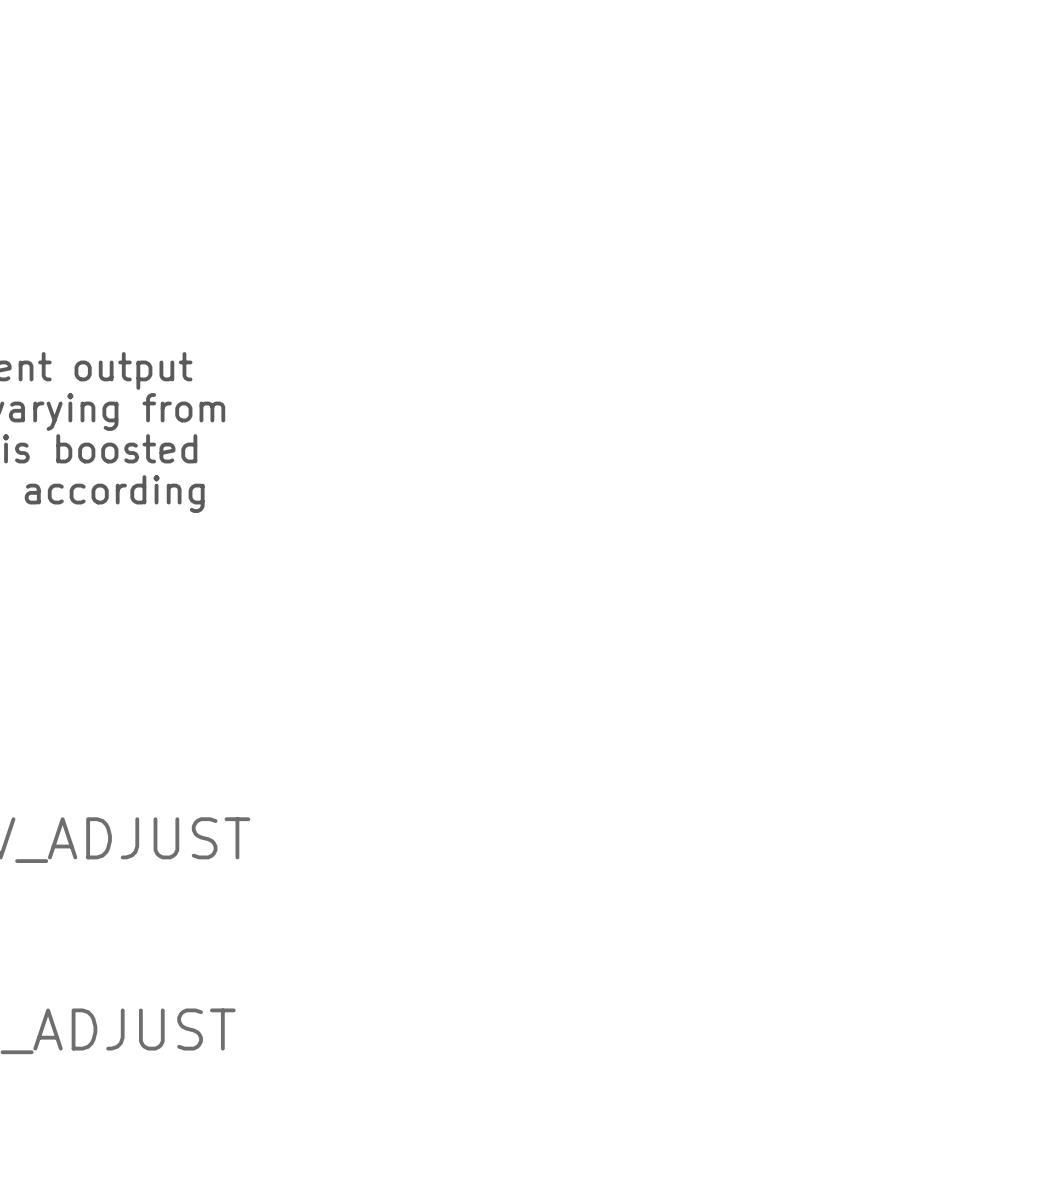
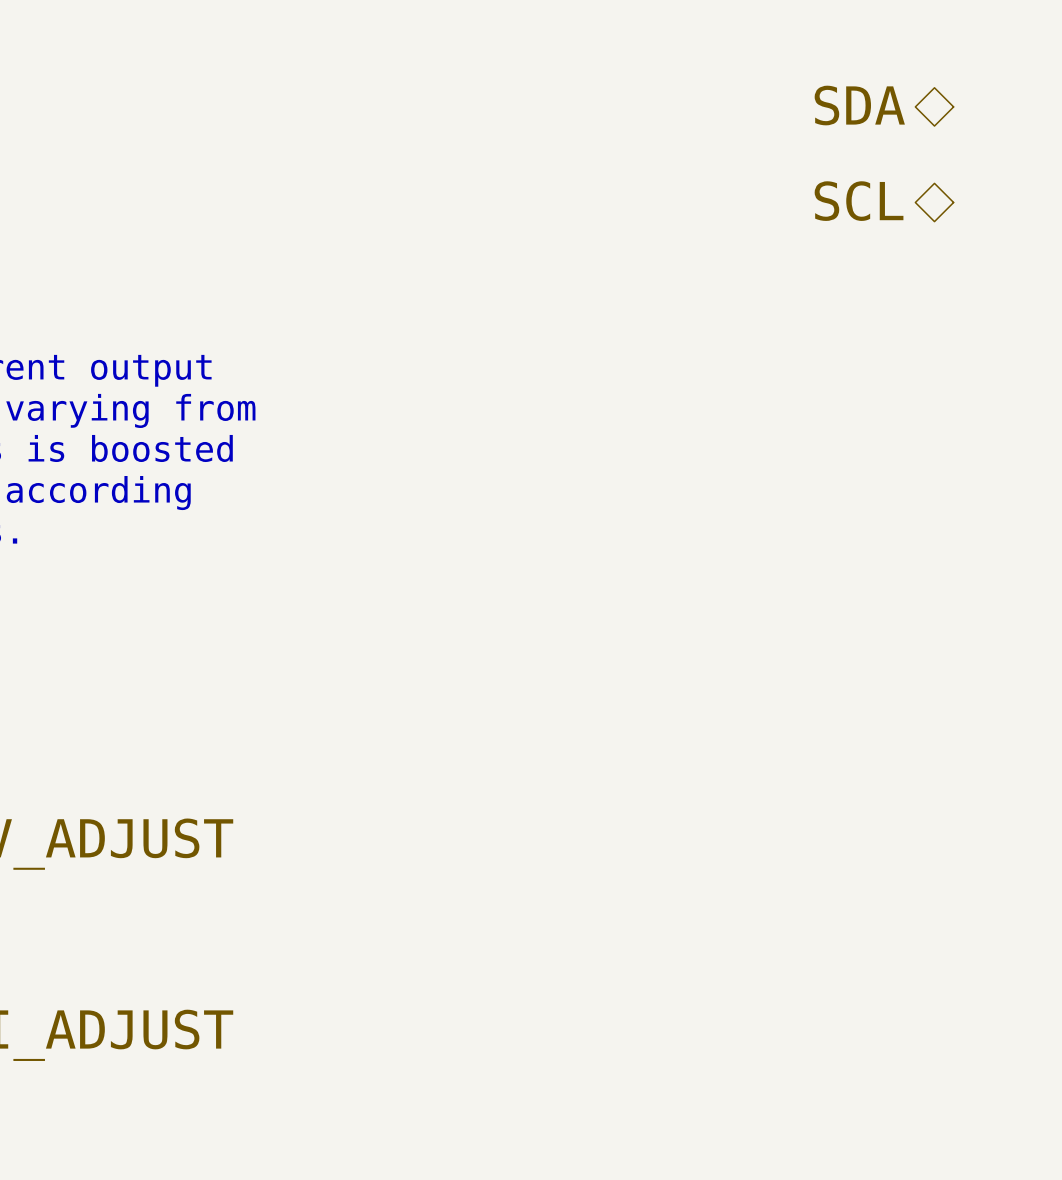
hierarchical label: none -> SDA (859, 105)
hierarchical label: none -> SCL (859, 201)

